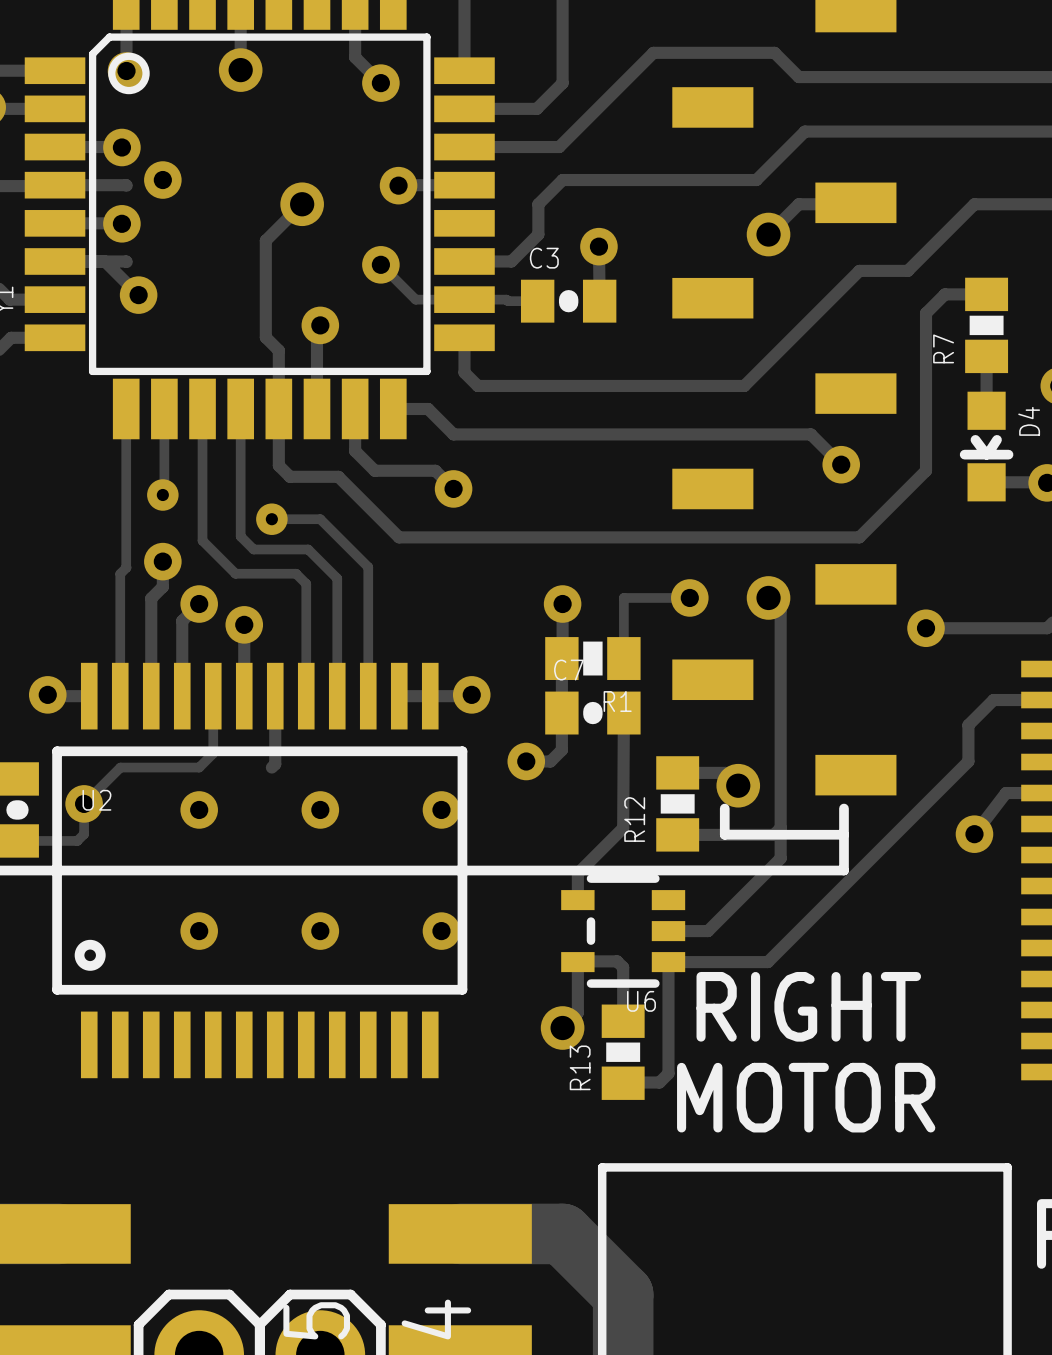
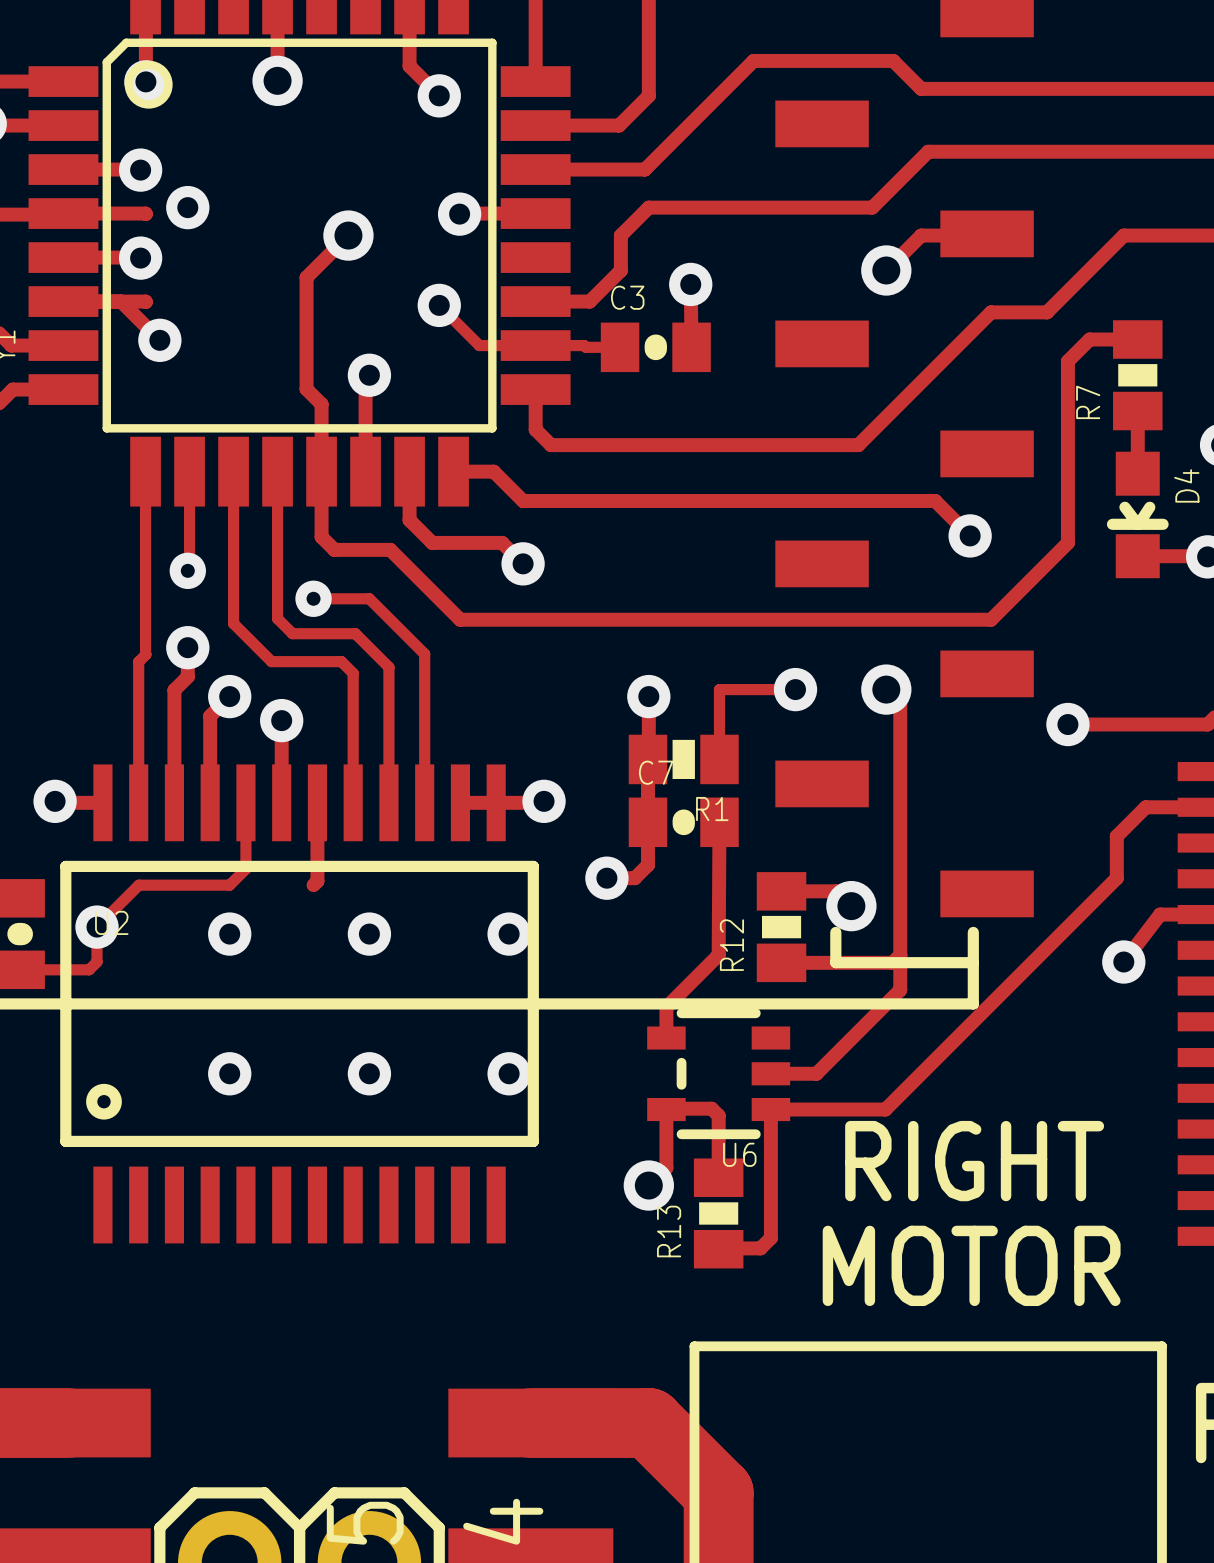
text position: RIGHT (808, 1006) -> RIGHT (974, 1161)
text position: MOTOR (806, 1097) -> MOTOR (971, 1265)

